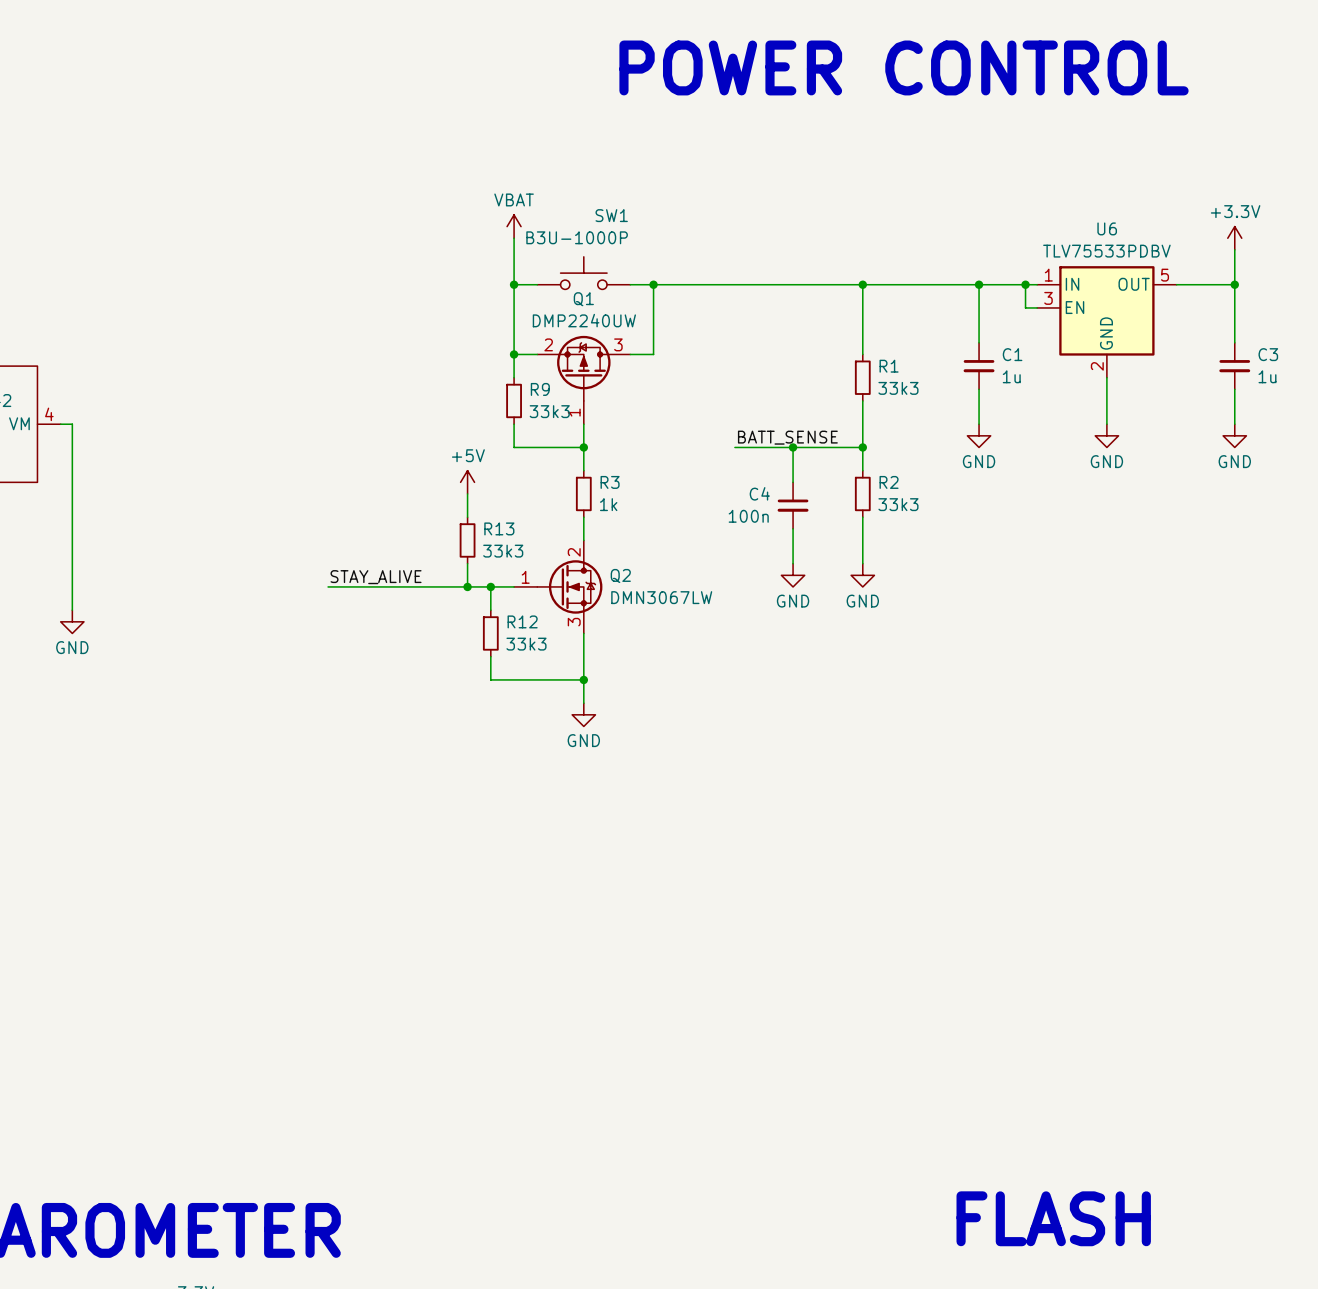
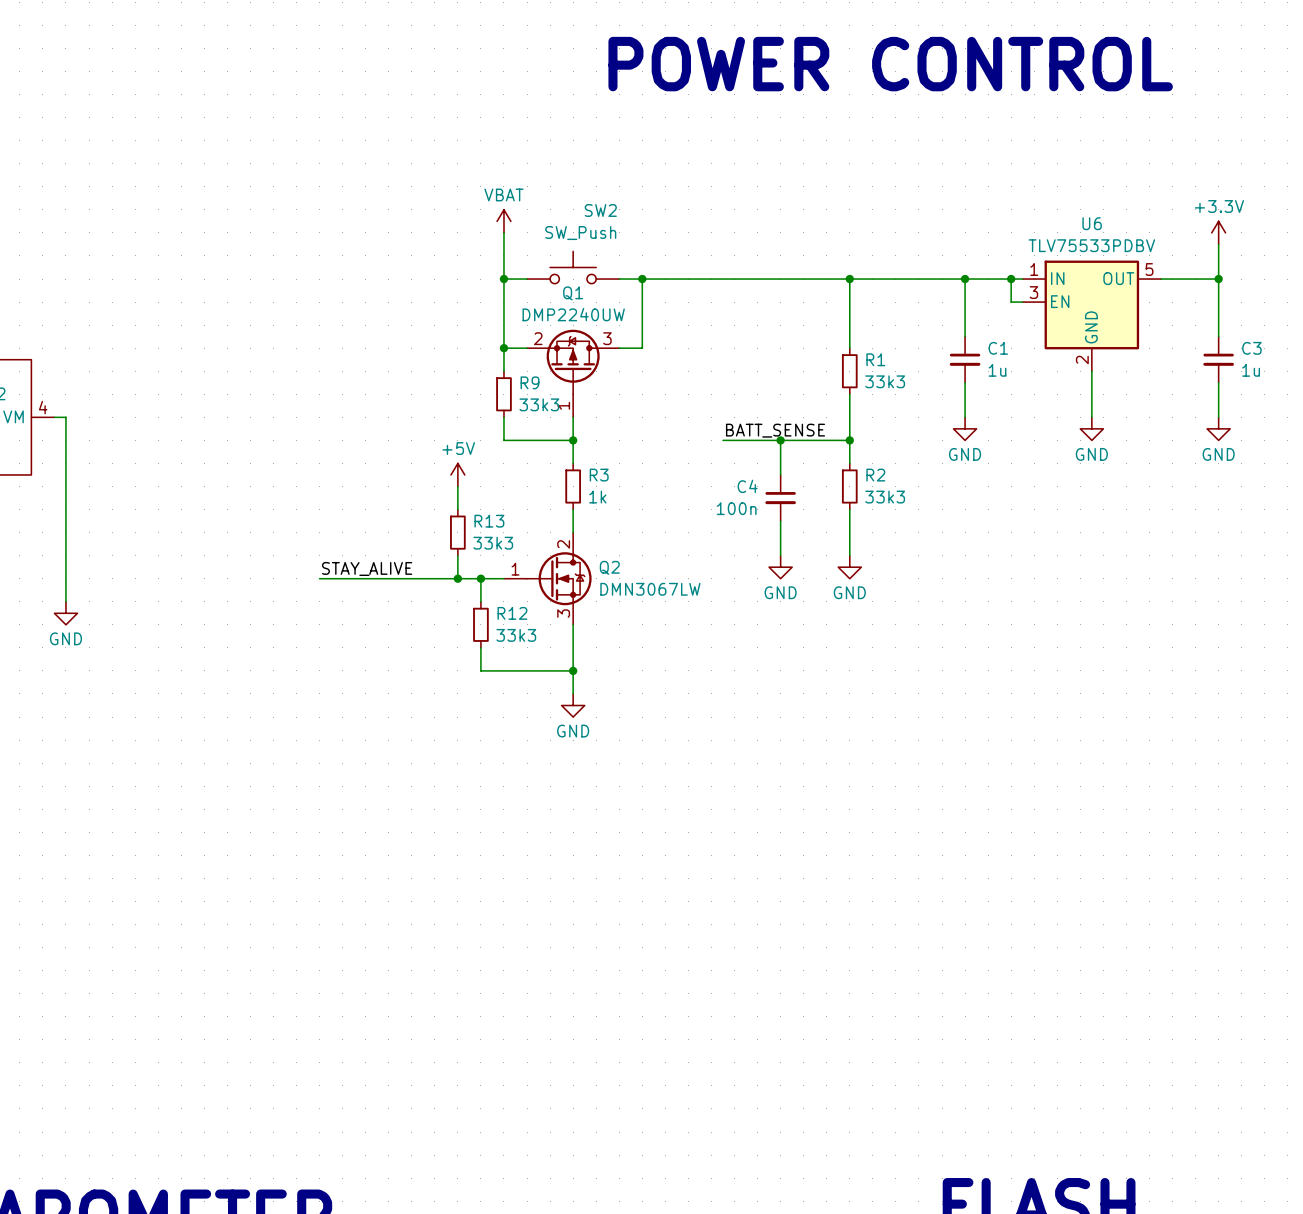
SW1 name: SW1 (611, 215) -> SW2 (600, 210)
SW1 value: B3U-1000P (577, 237) -> SW_Push (580, 233)

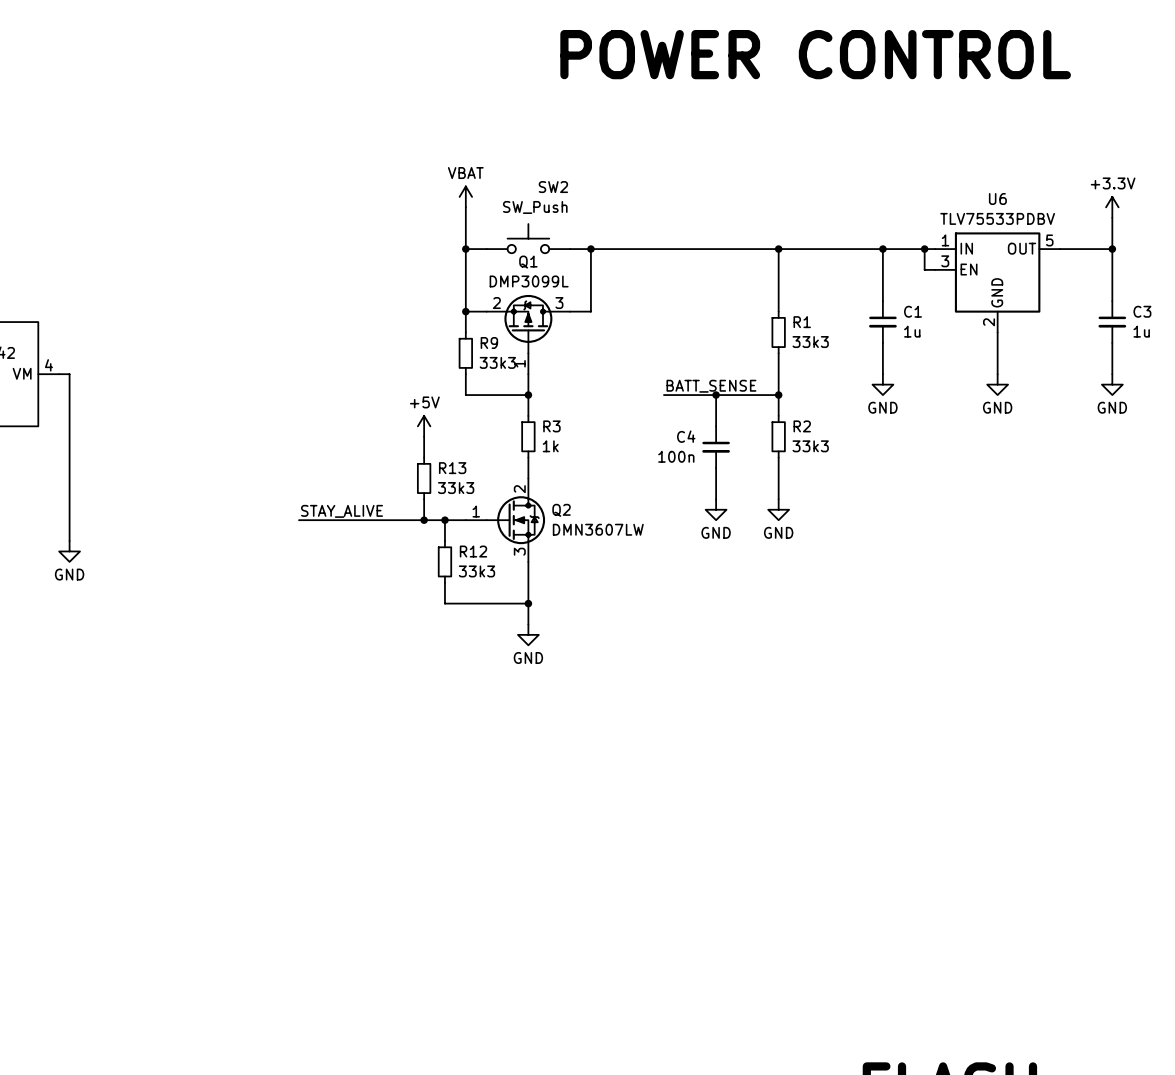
Q1 value: DMP2240UW (573, 314) -> DMP3099L (529, 281)
Q2 value: DMN3067LW (650, 589) -> DMN3607LW (598, 529)

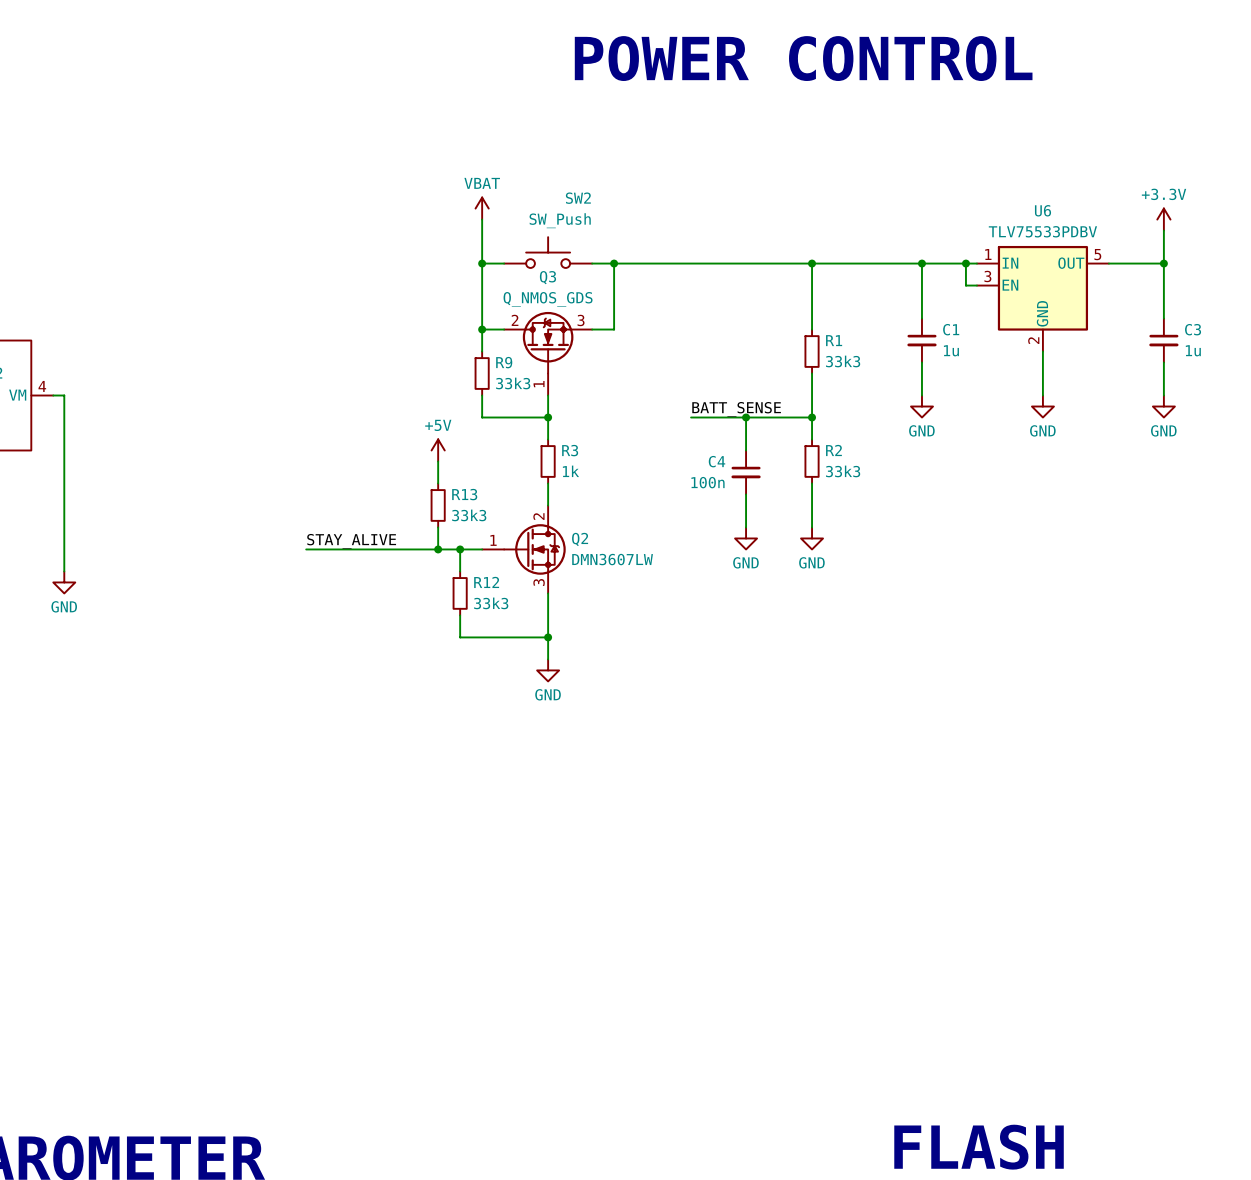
Q1: DMP3099L (528, 334) -> none
Q3: none -> Q_NMOS_GDS (548, 353)

